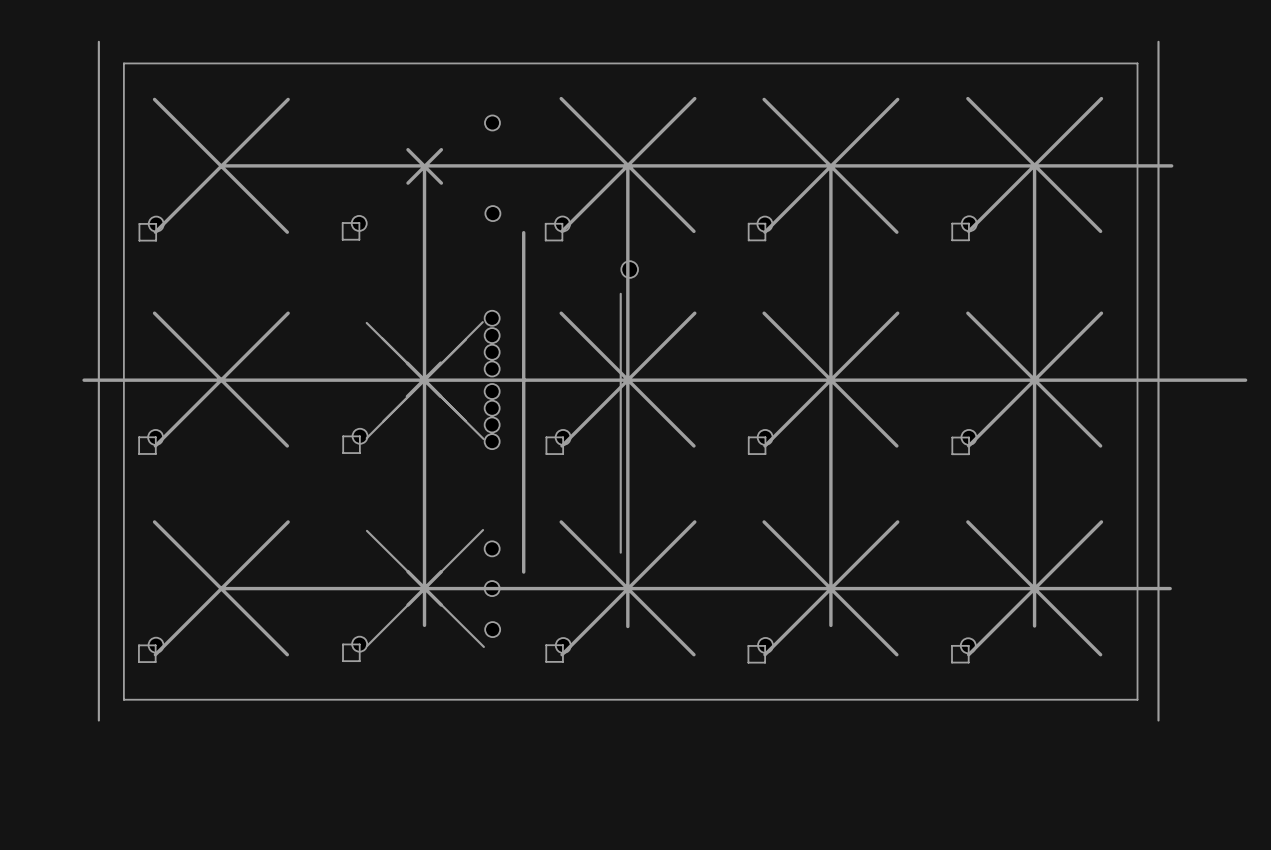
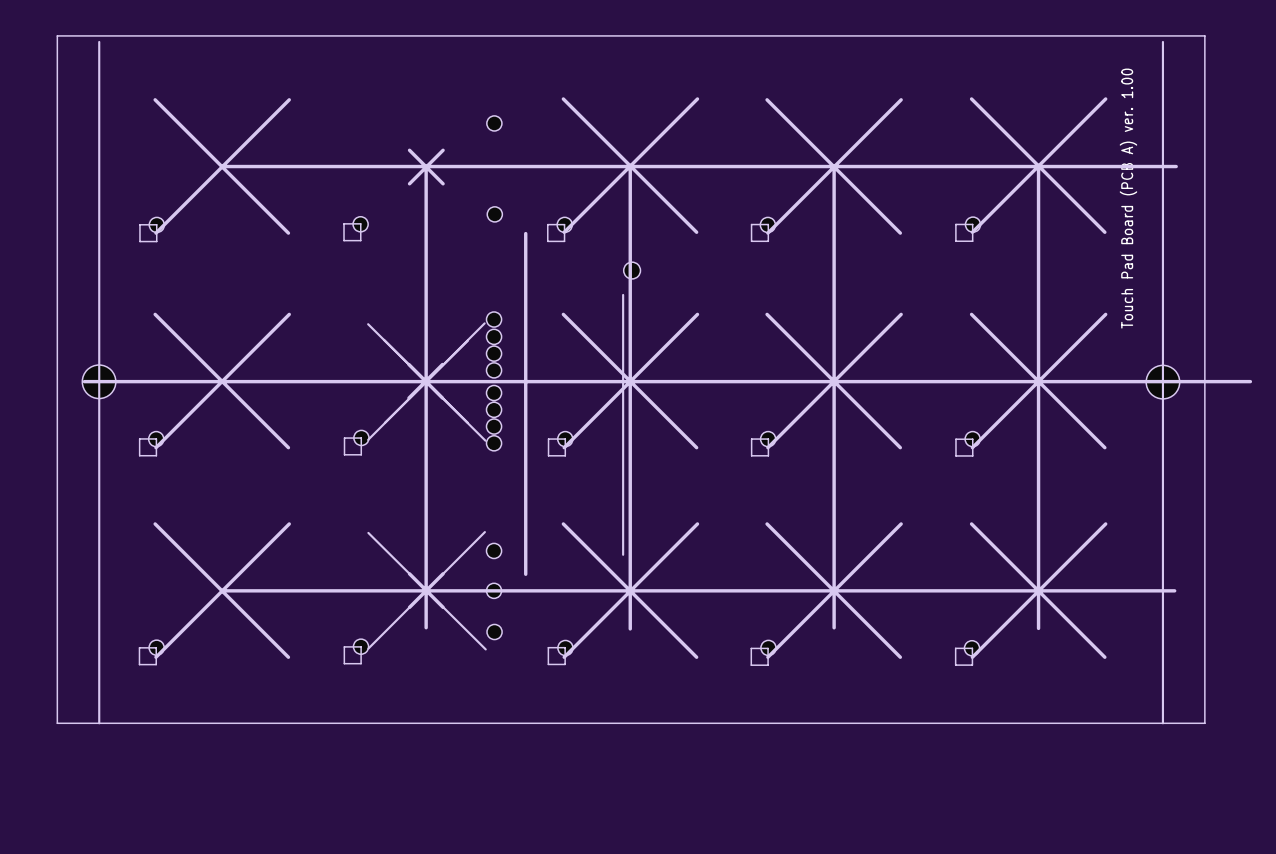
board edge: (123, 63) (1137, 63) (1137, 699) (123, 699) (123, 63) -> (57, 35) (57, 723) (1204, 723) (1204, 35) (57, 35)
text: none -> Touch Pad Board (PCB A) ver. 1.00 (1128, 198)
hole: none -> (99, 381)
hole: none -> (1162, 382)

